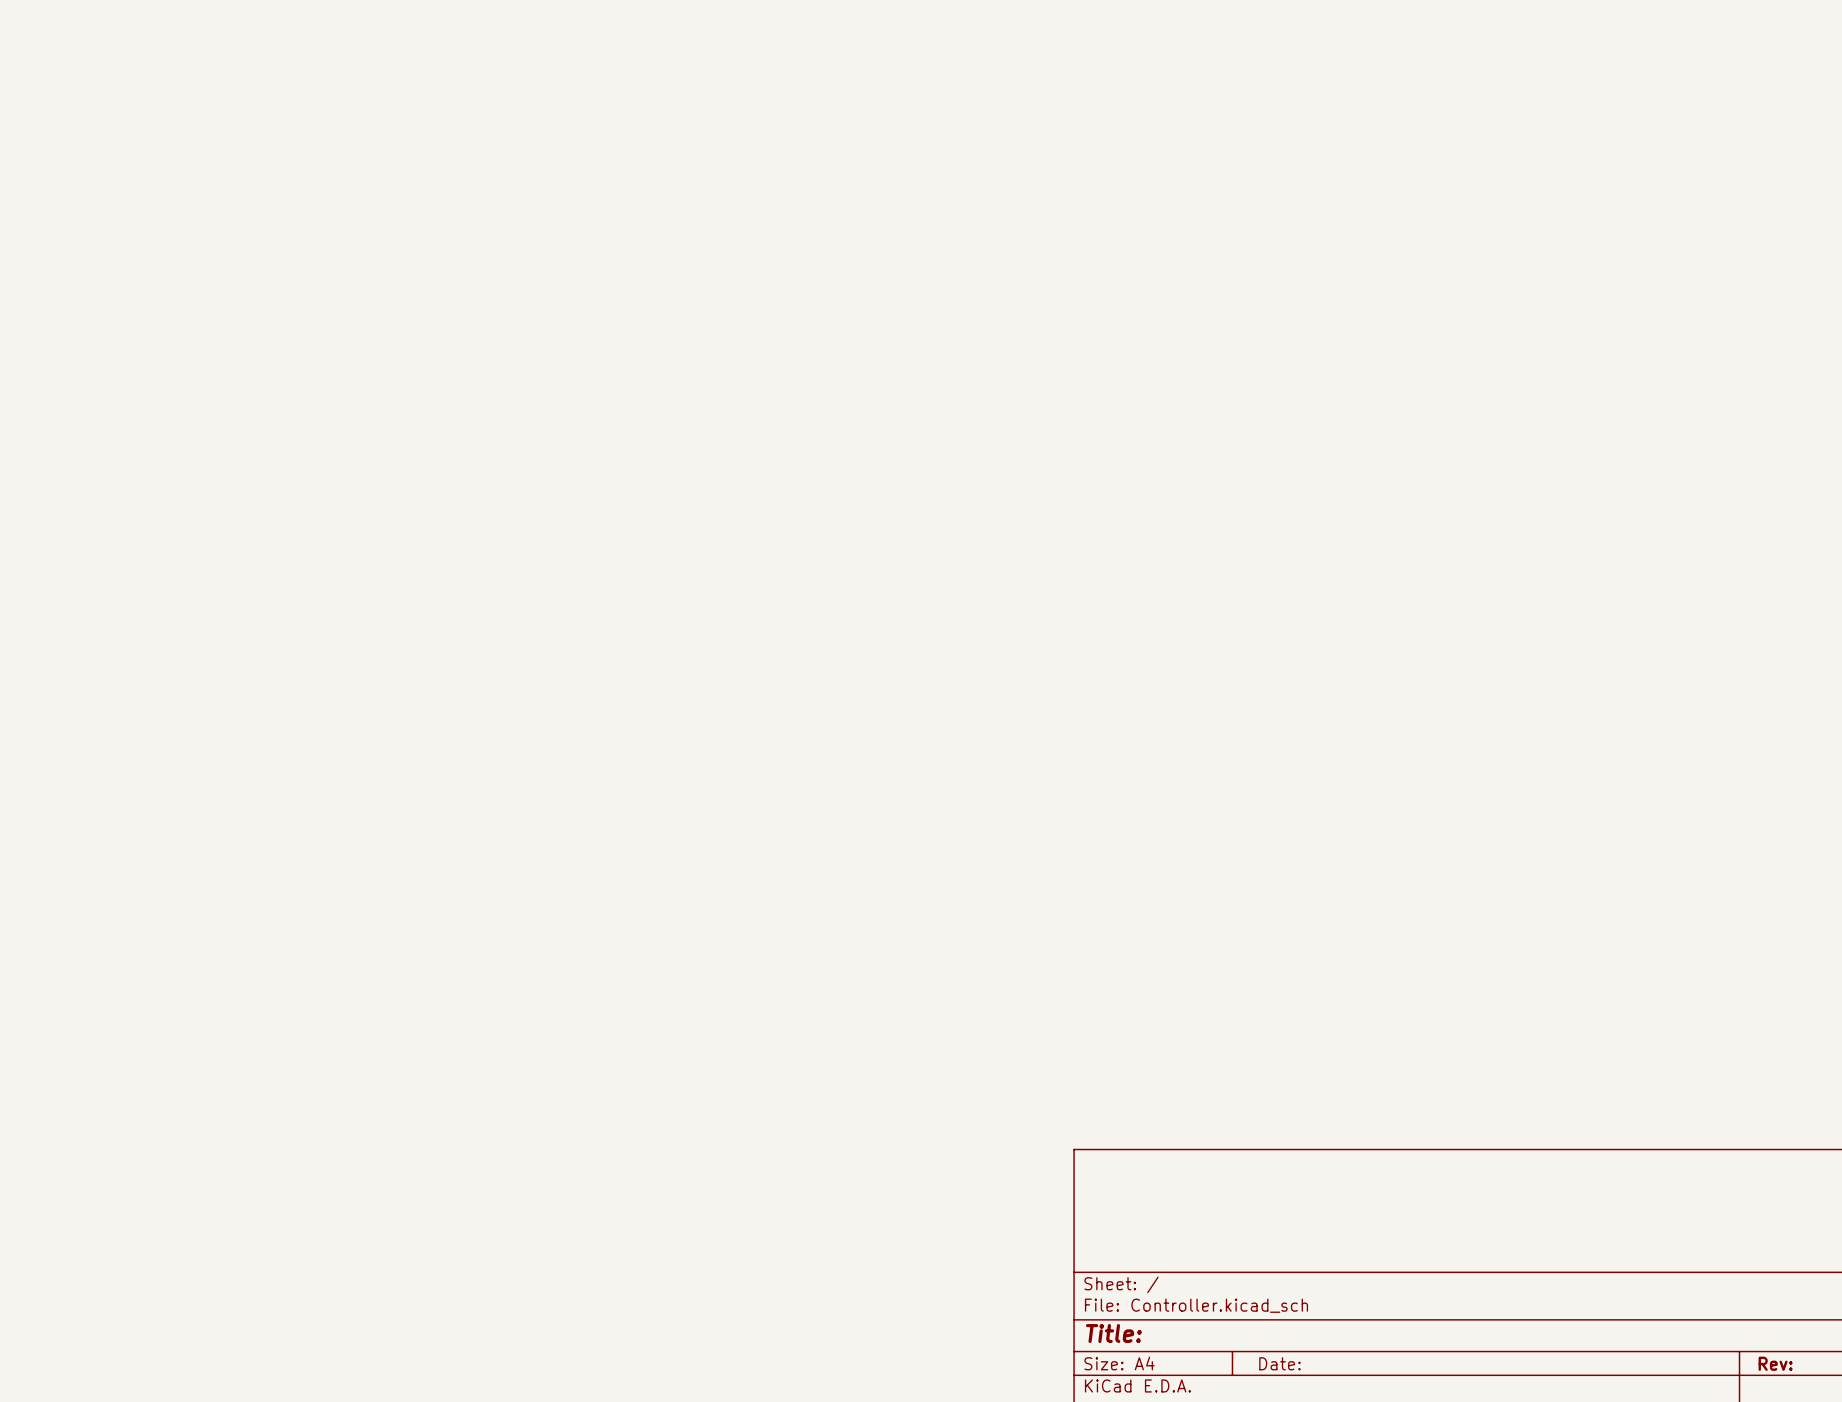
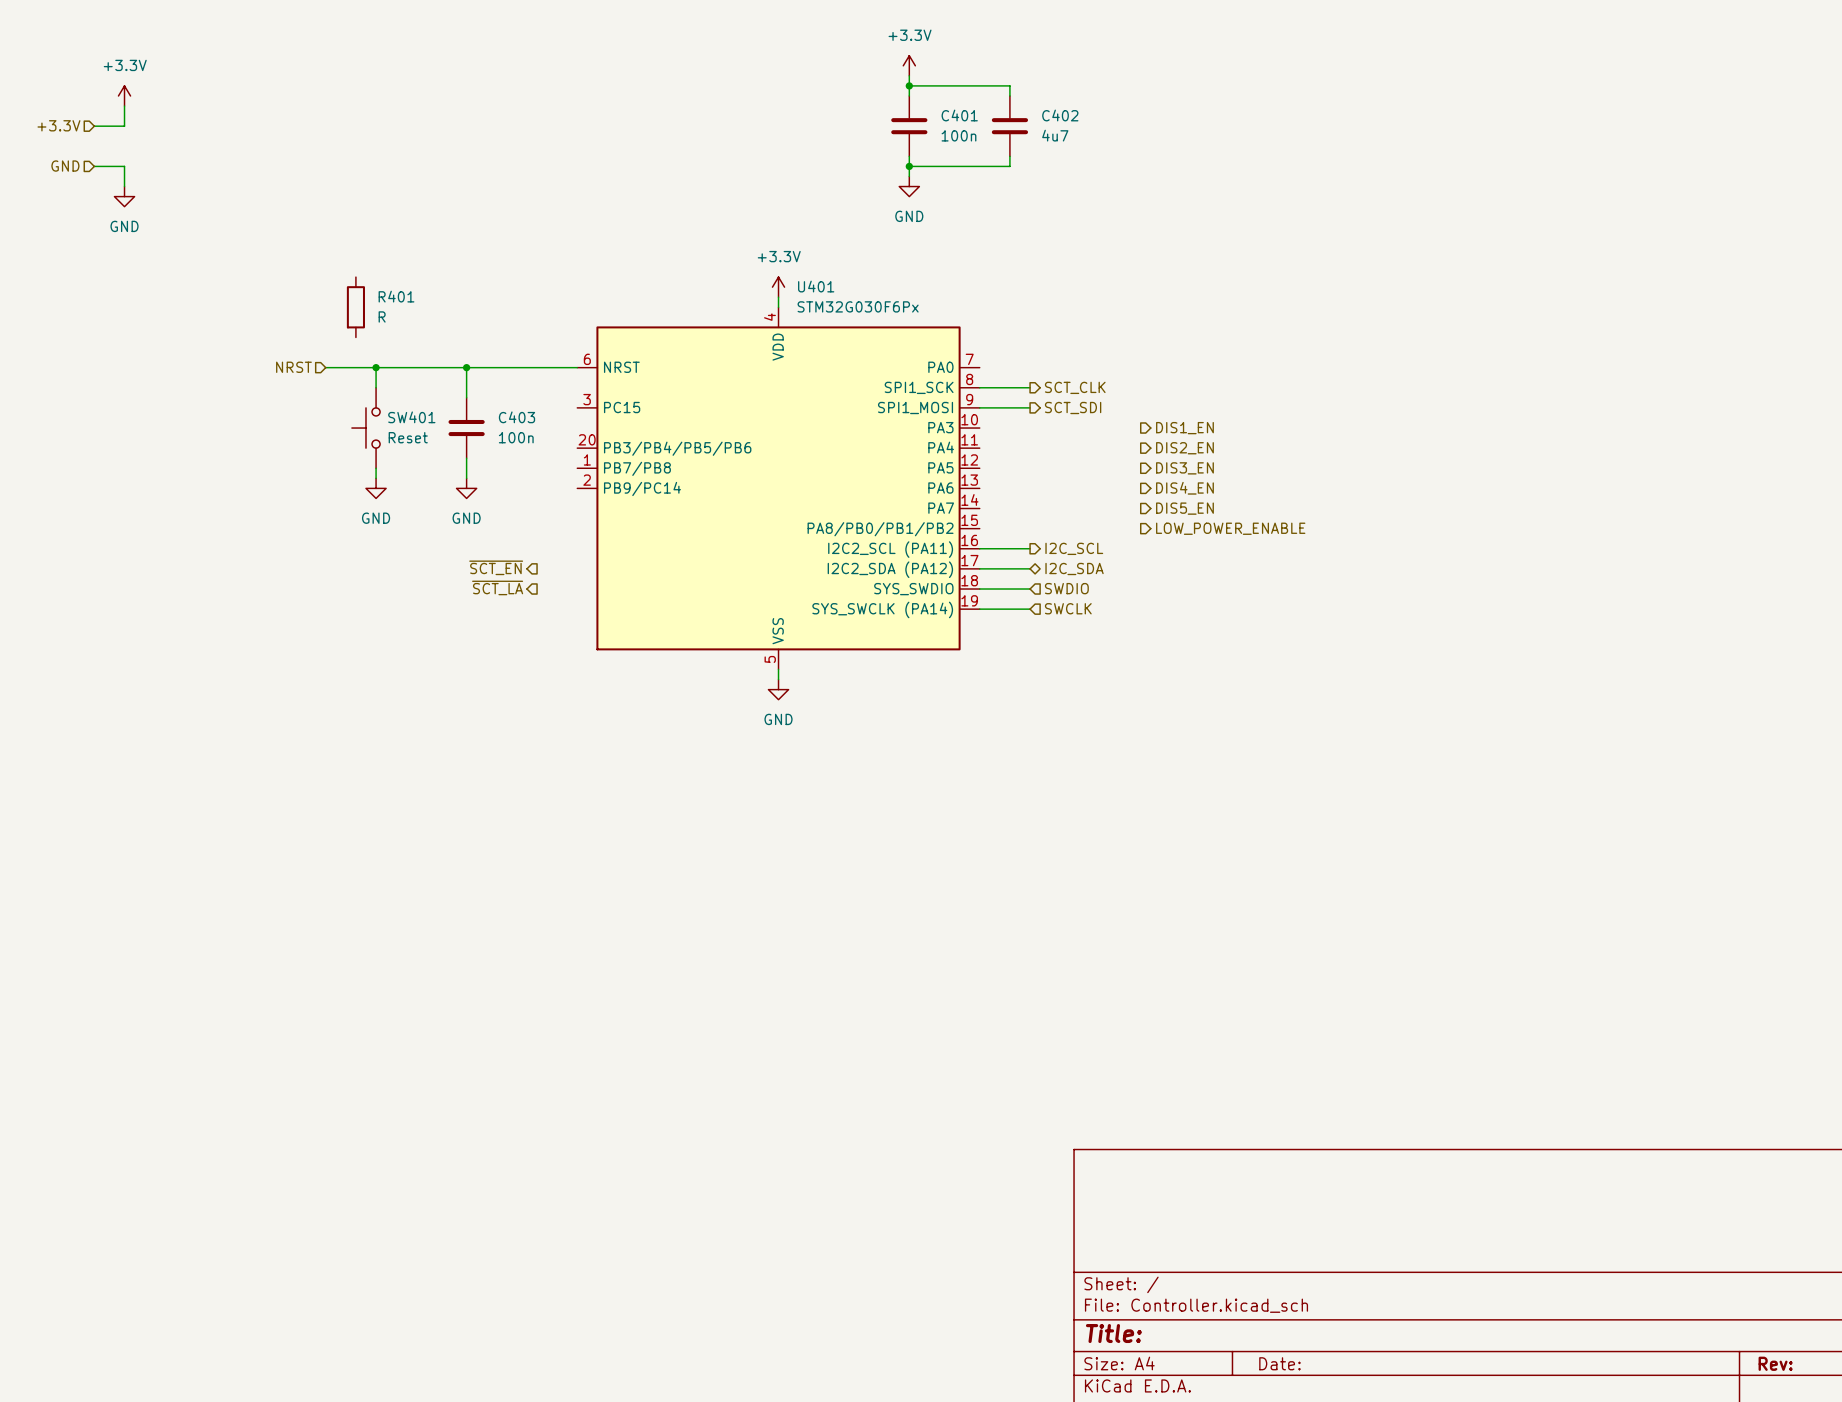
power symbol: none -> +3.3V (909, 65)
wire: none -> (909, 75) (909, 95)
wire: none -> (909, 85) (1009, 85) (1009, 95)
junction: none -> (909, 85)
power symbol: none -> +3.3V (124, 95)
wire: none -> (124, 106) (124, 126) (94, 126)
hierarchical label: none -> +3.3V (58, 125)
C401: none -> 100n (909, 126)
C402: none -> 4u7 (1009, 126)
wire: none -> (909, 156) (909, 176)
wire: none -> (1009, 156) (1009, 166) (909, 166)
hierarchical label: none -> GND (65, 166)
wire: none -> (94, 166) (124, 166) (124, 186)
junction: none -> (909, 166)
power symbol: none -> GND (909, 186)
power symbol: none -> GND (124, 196)
power symbol: none -> +3.3V (778, 287)
wire: none -> (778, 297) (778, 307)
R401: none -> R (355, 307)
hierarchical label: none -> NRST (293, 367)
wire: none -> (325, 367) (577, 367)
wire: none -> (376, 367) (376, 387)
junction: none -> (376, 367)
wire: none -> (466, 367) (466, 397)
junction: none -> (466, 367)
wire: none -> (979, 387) (1030, 387)
hierarchical label: none -> SCT_CLK (1075, 387)
wire: none -> (979, 407) (1030, 407)
hierarchical label: none -> SCT_SDI (1073, 408)
SW401: none -> Reset (365, 428)
C403: none -> 100n (466, 428)
hierarchical label: none -> DIS1_EN (1184, 428)
hierarchical label: none -> DIS2_EN (1184, 448)
wire: none -> (466, 458) (466, 478)
wire: none -> (376, 468) (376, 478)
hierarchical label: none -> DIS3_EN (1184, 468)
power symbol: none -> GND (376, 488)
power symbol: none -> GND (466, 488)
U401: none -> STM32G030F6Px (778, 488)
hierarchical label: none -> DIS4_EN (1184, 488)
hierarchical label: none -> DIS5_EN (1184, 508)
hierarchical label: none -> LOW_POWER_ENABLE (1230, 528)
wire: none -> (979, 548) (1030, 548)
hierarchical label: none -> I2C_SCL (1074, 548)
hierarchical label: none -> ~{SCT_EN} (496, 567)
wire: none -> (979, 568) (1030, 568)
hierarchical label: none -> I2C_SDA (1074, 568)
hierarchical label: none -> ~{SCT_LA} (497, 587)
hierarchical label: none -> SWDIO (1066, 588)
wire: none -> (979, 589) (1030, 589)
hierarchical label: none -> SWCLK (1068, 608)
wire: none -> (979, 609) (1030, 609)
wire: none -> (778, 669) (778, 679)
power symbol: none -> GND (778, 689)

